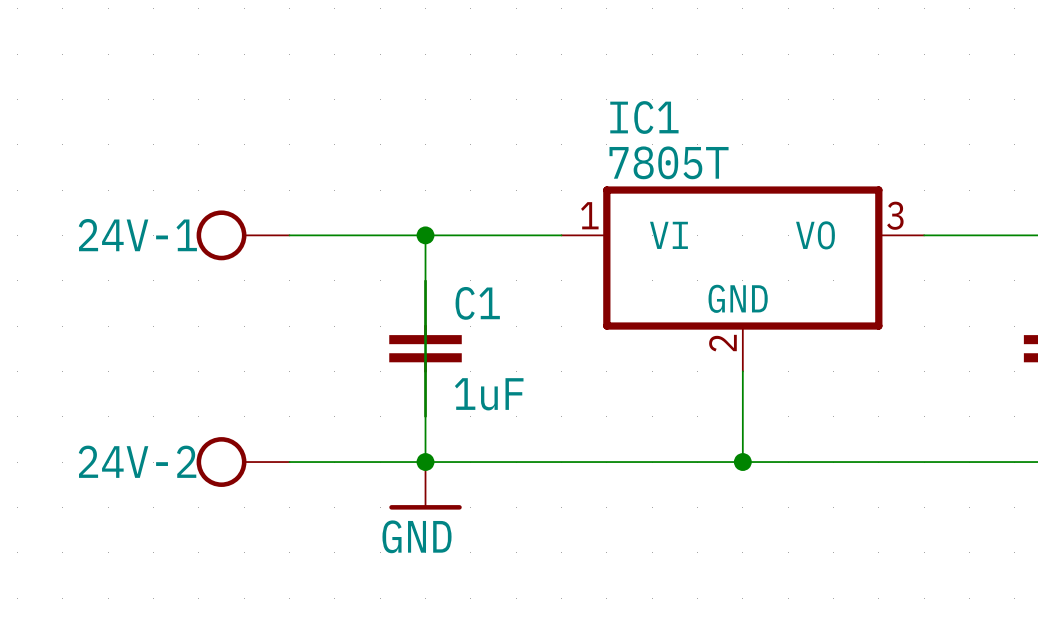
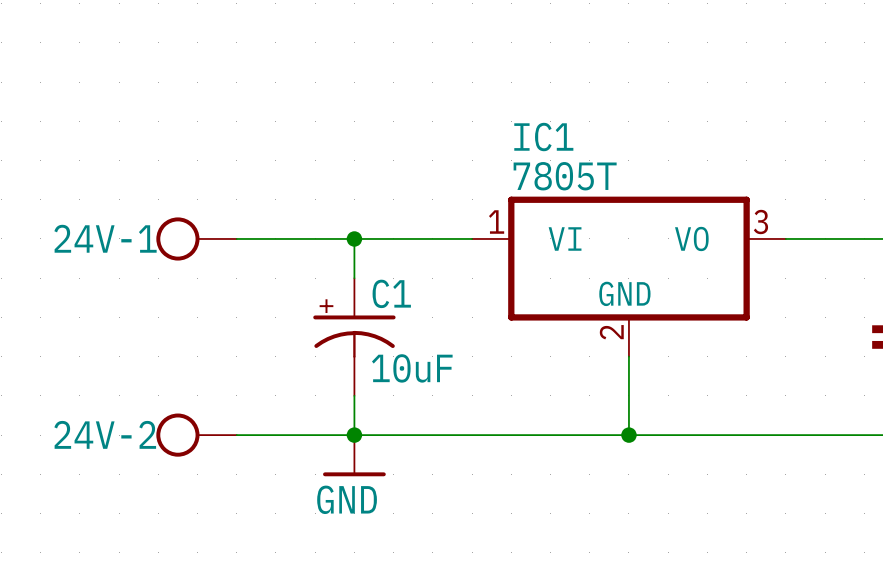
C1 symbol: [389, 280, 462, 417] -> [313, 278, 396, 396]
C1 value: 1uF (489, 394) -> 10uF (412, 368)

